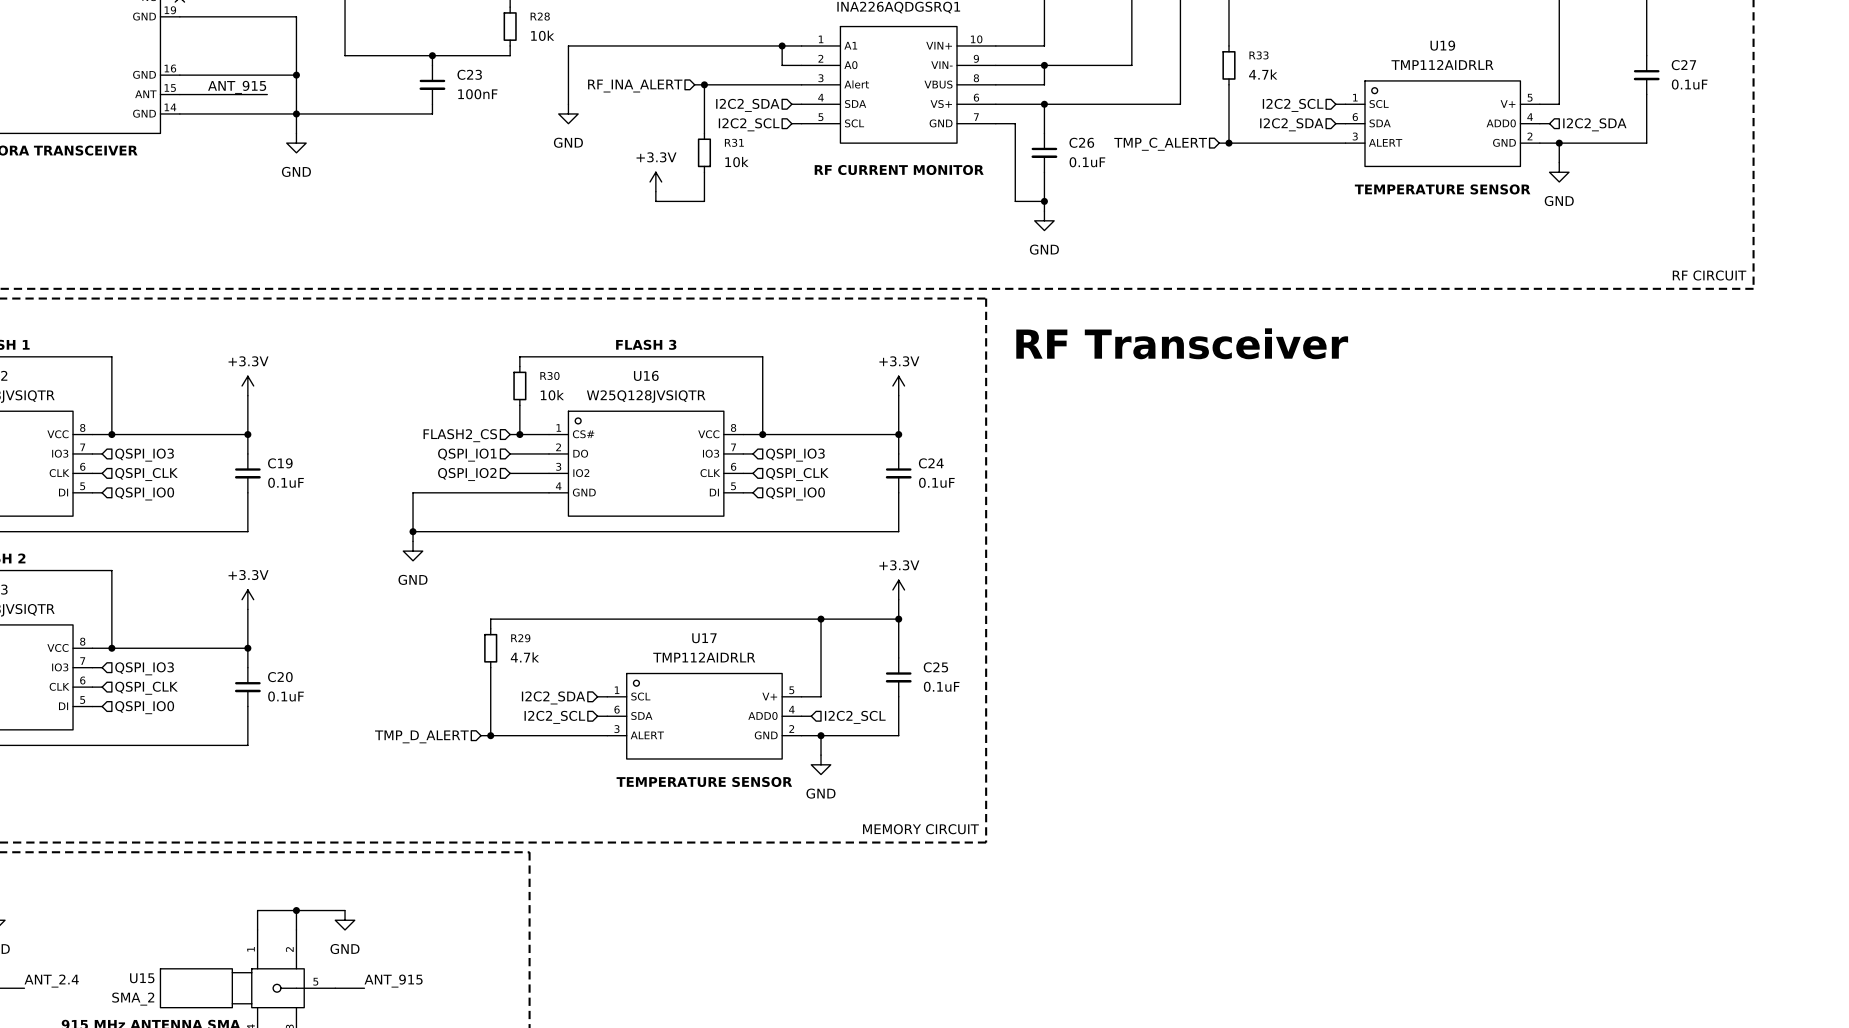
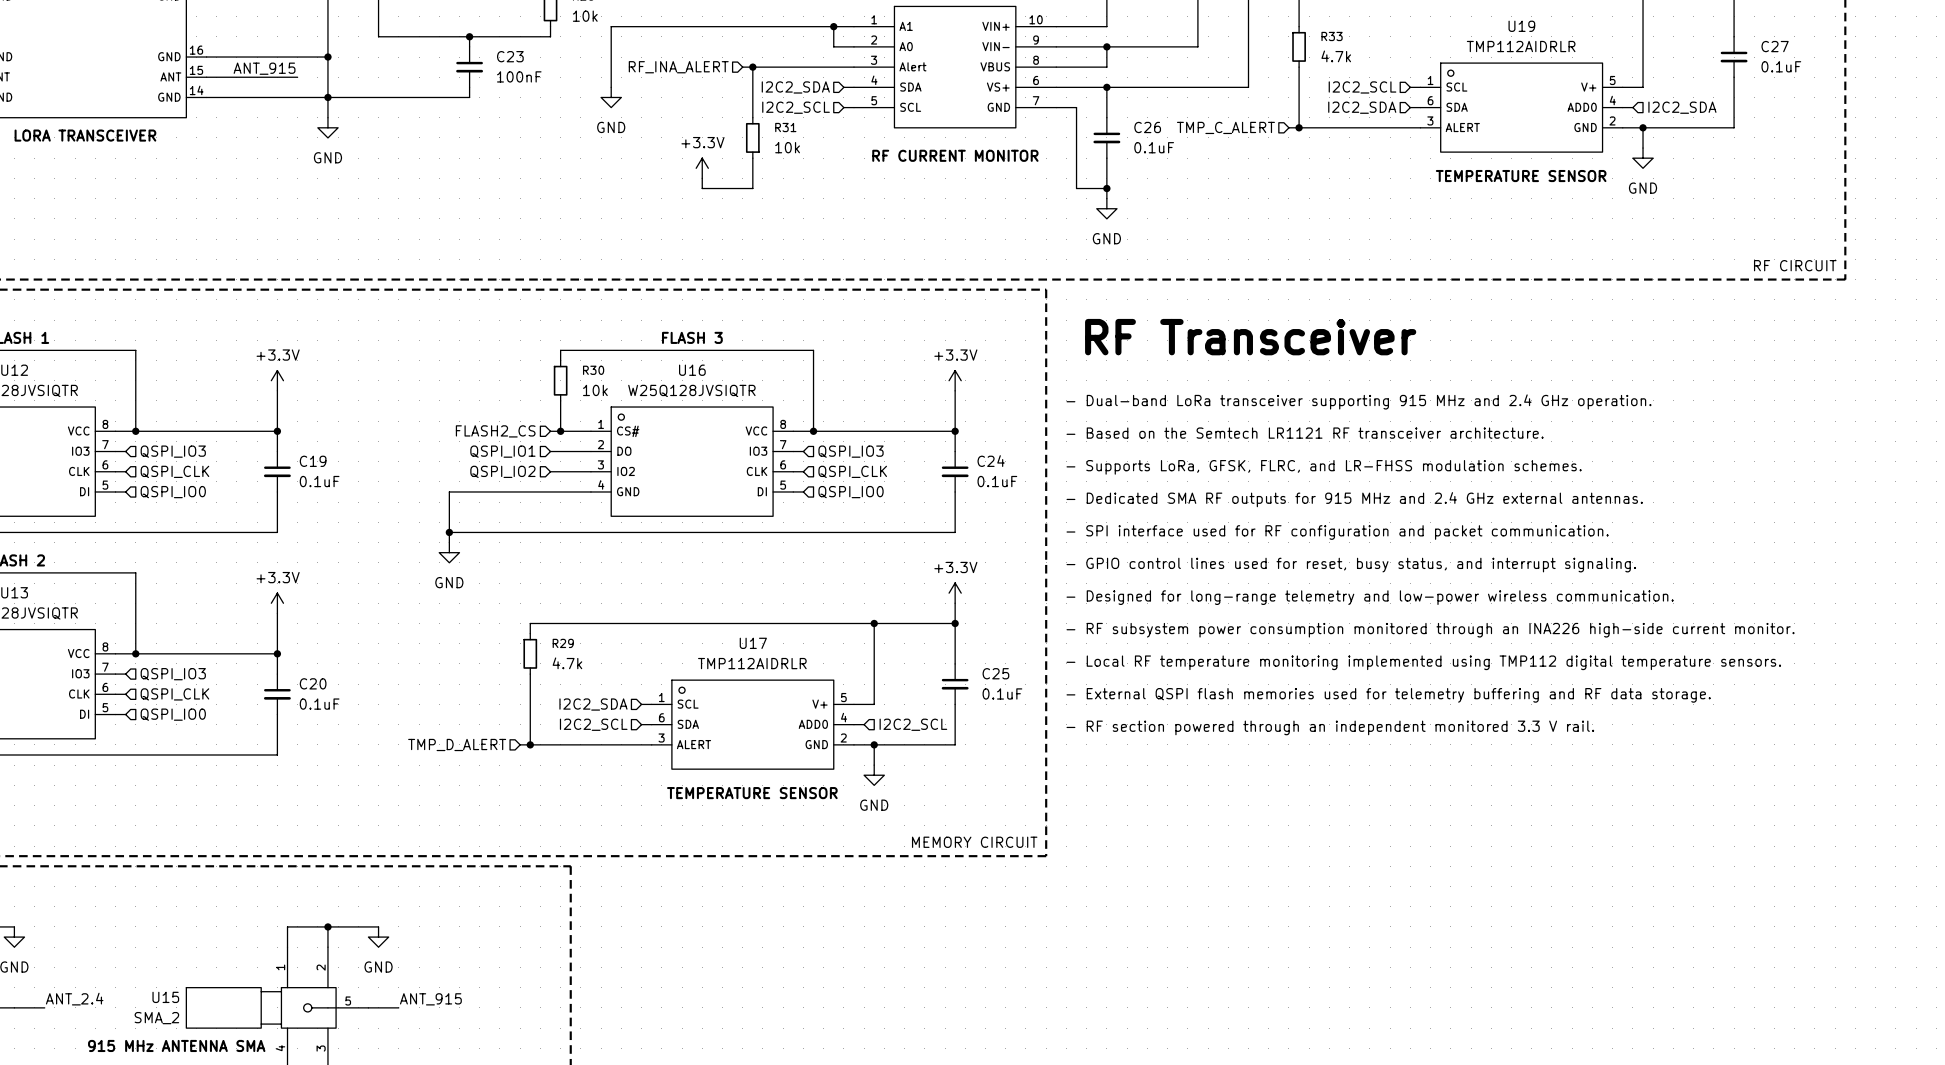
text: none -> - Dual-band LoRa transceiver supporting 915 MHz and 2.4 GHz operation. (1359, 401)
text: none -> - Based on the Semtech LR1121 RF transceiver architecture. (1305, 433)
text: none -> - Supports LoRa, GFSK, FLRC, and LR-FHSS modulation schemes. (1324, 467)
text: none -> - Dedicated SMA RF outputs for 915 MHz and 2.4 GHz external antennas. (1354, 499)
text: none -> - SPI interface used for RF configuration and packet communication. (1337, 532)
text: none -> - GPIO control lines used for reset, busy status, and interrupt signaling. (1351, 565)
text: none -> - Designed for long-range telemetry and low-power wireless communication. (1370, 597)
text: none -> - RF subsystem power consumption monitored through an INA226 high-side current monitor. (1430, 630)
text: none -> - Local RF temperature monitoring implemented using TMP112 digital temperature sensors. (1423, 662)
text: none -> - External QSPI flash memories used for telemetry buffering and RF data storage. (1388, 695)
text: none -> - RF section powered through an independent monitored 3.3 V rail. (1330, 727)

